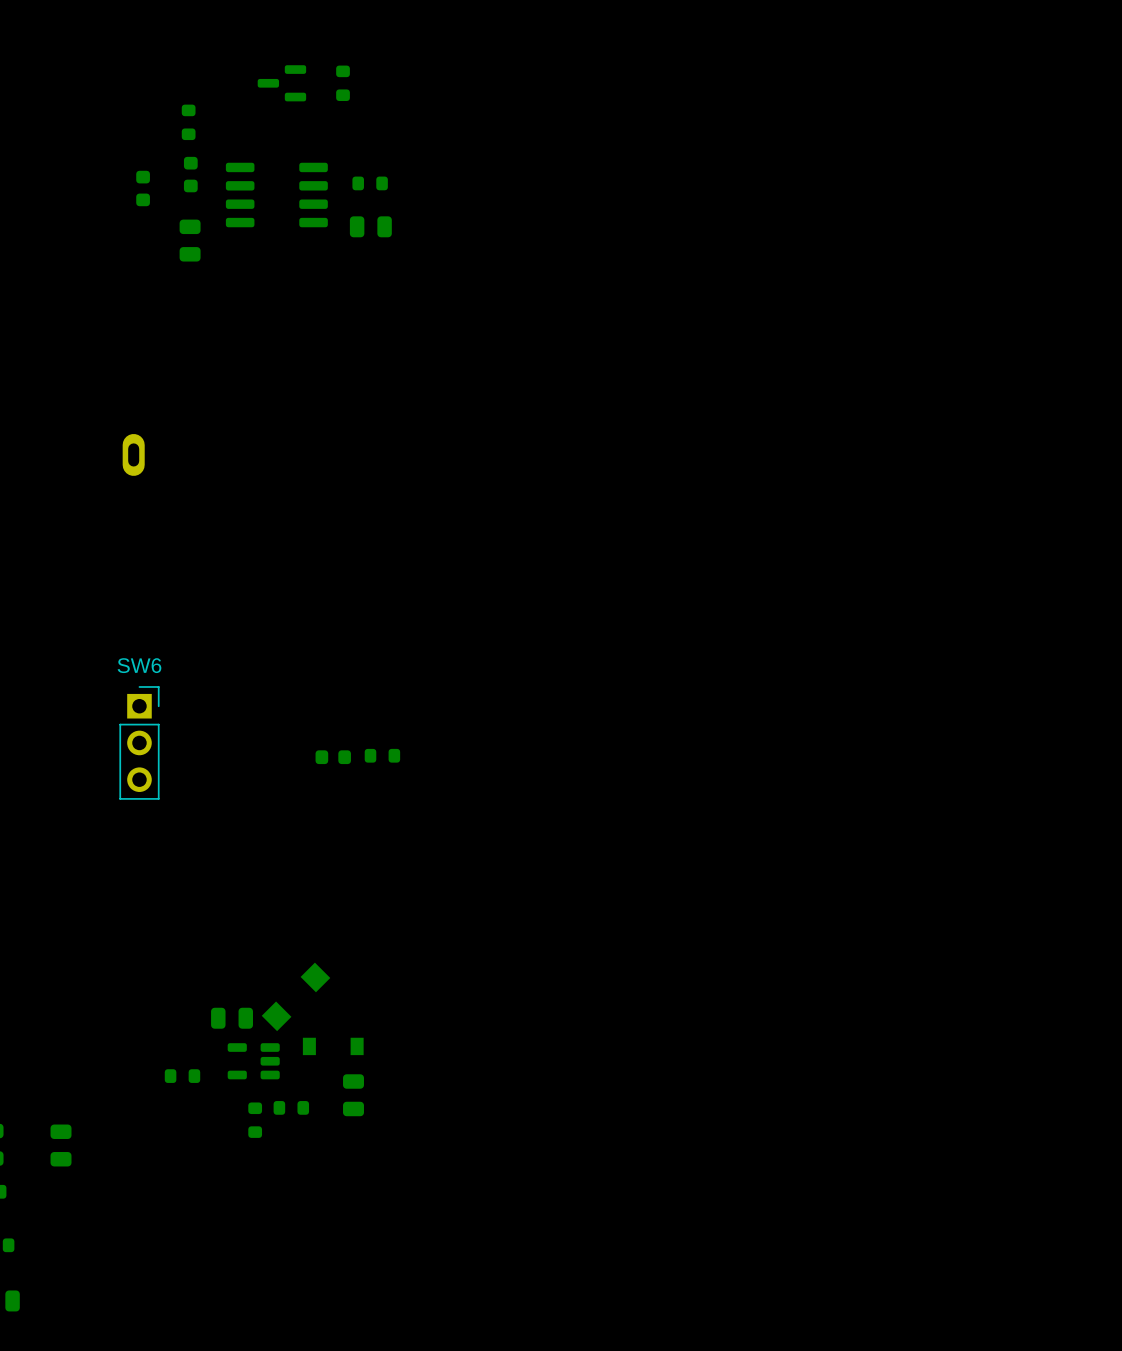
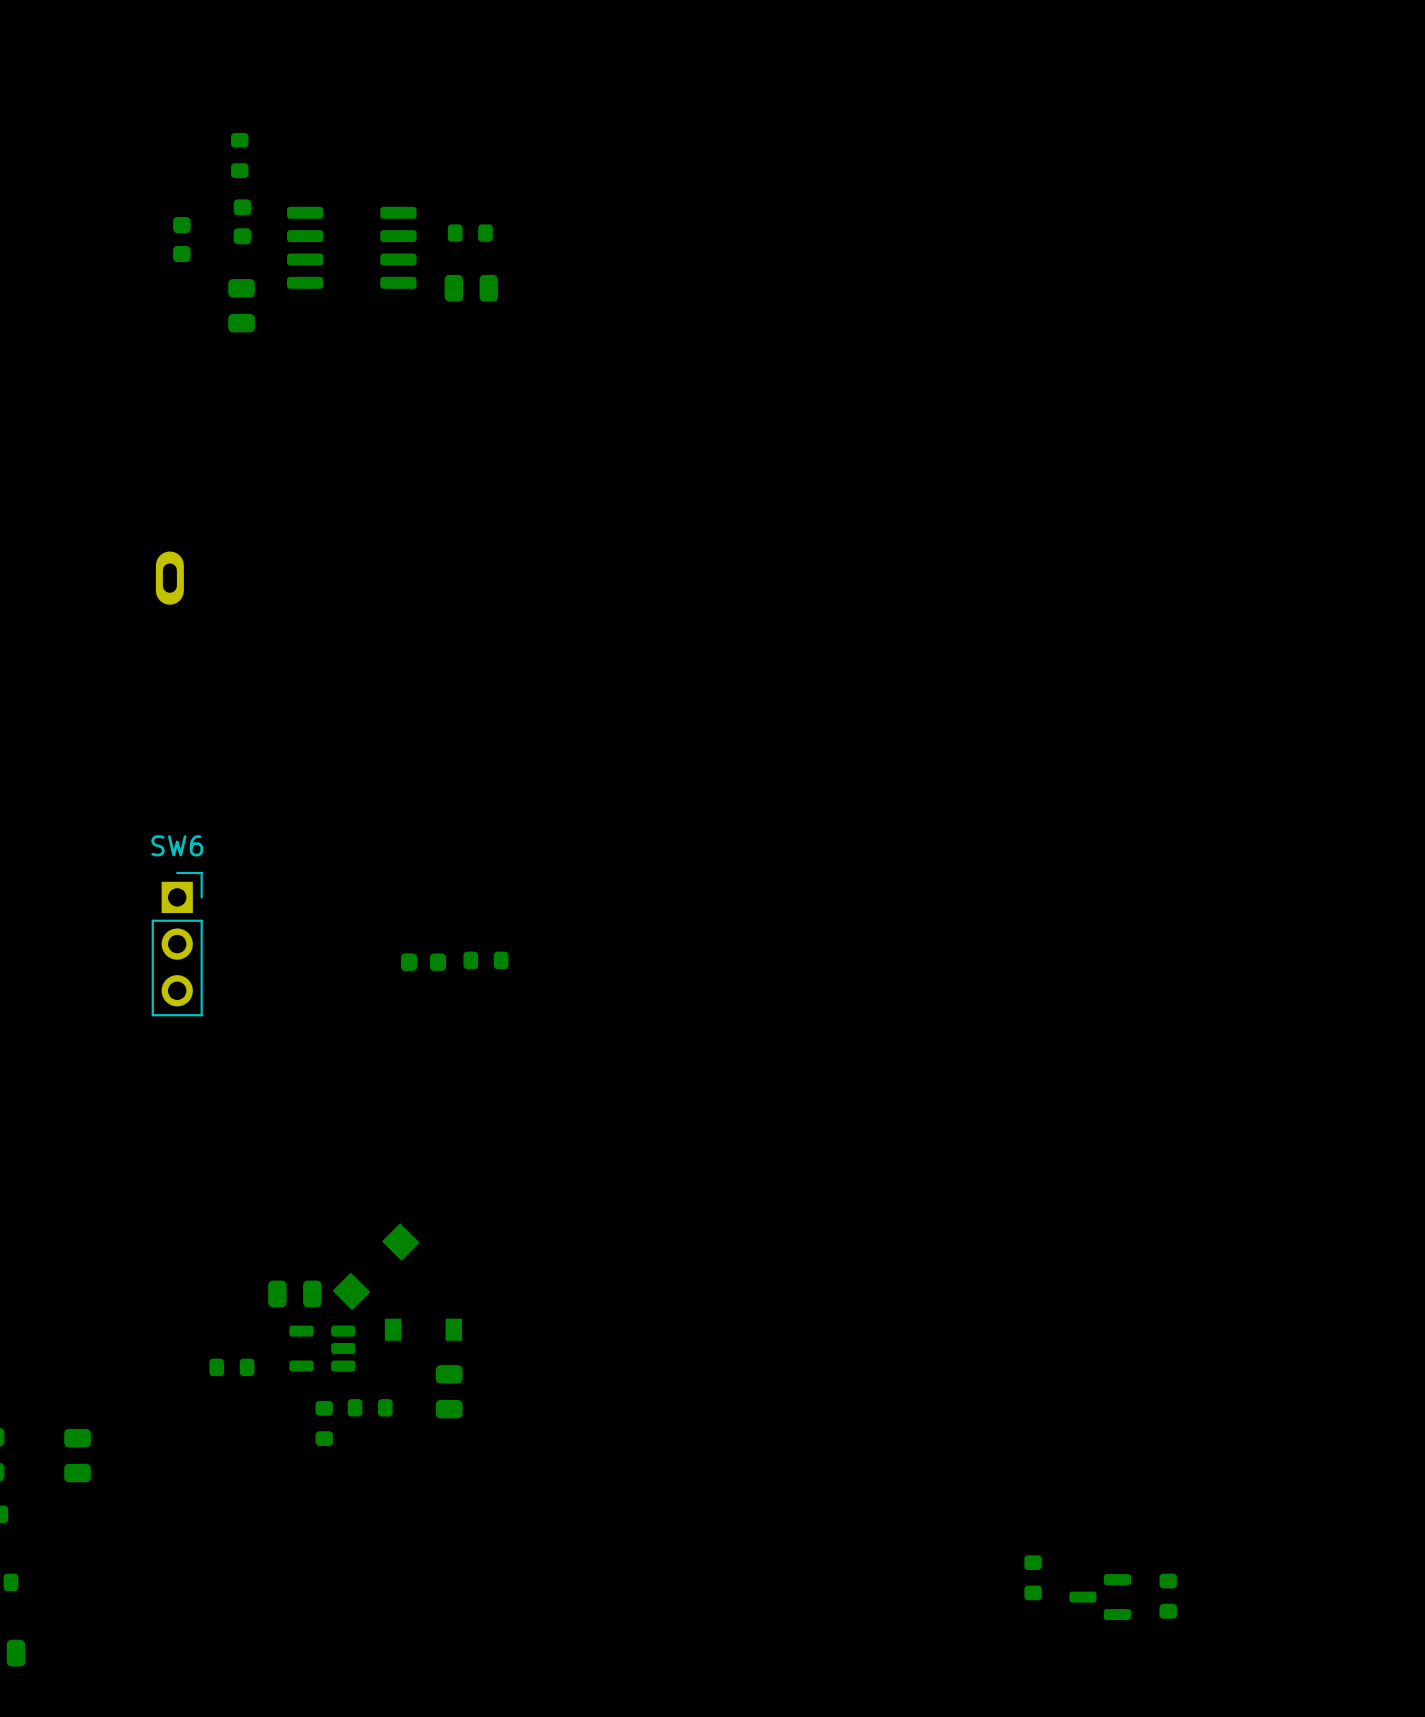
part: (281, 83) -> none
part: (343, 83) -> none
part: none -> (1033, 1577)
part: none -> (1100, 1597)
part: none -> (1168, 1596)

